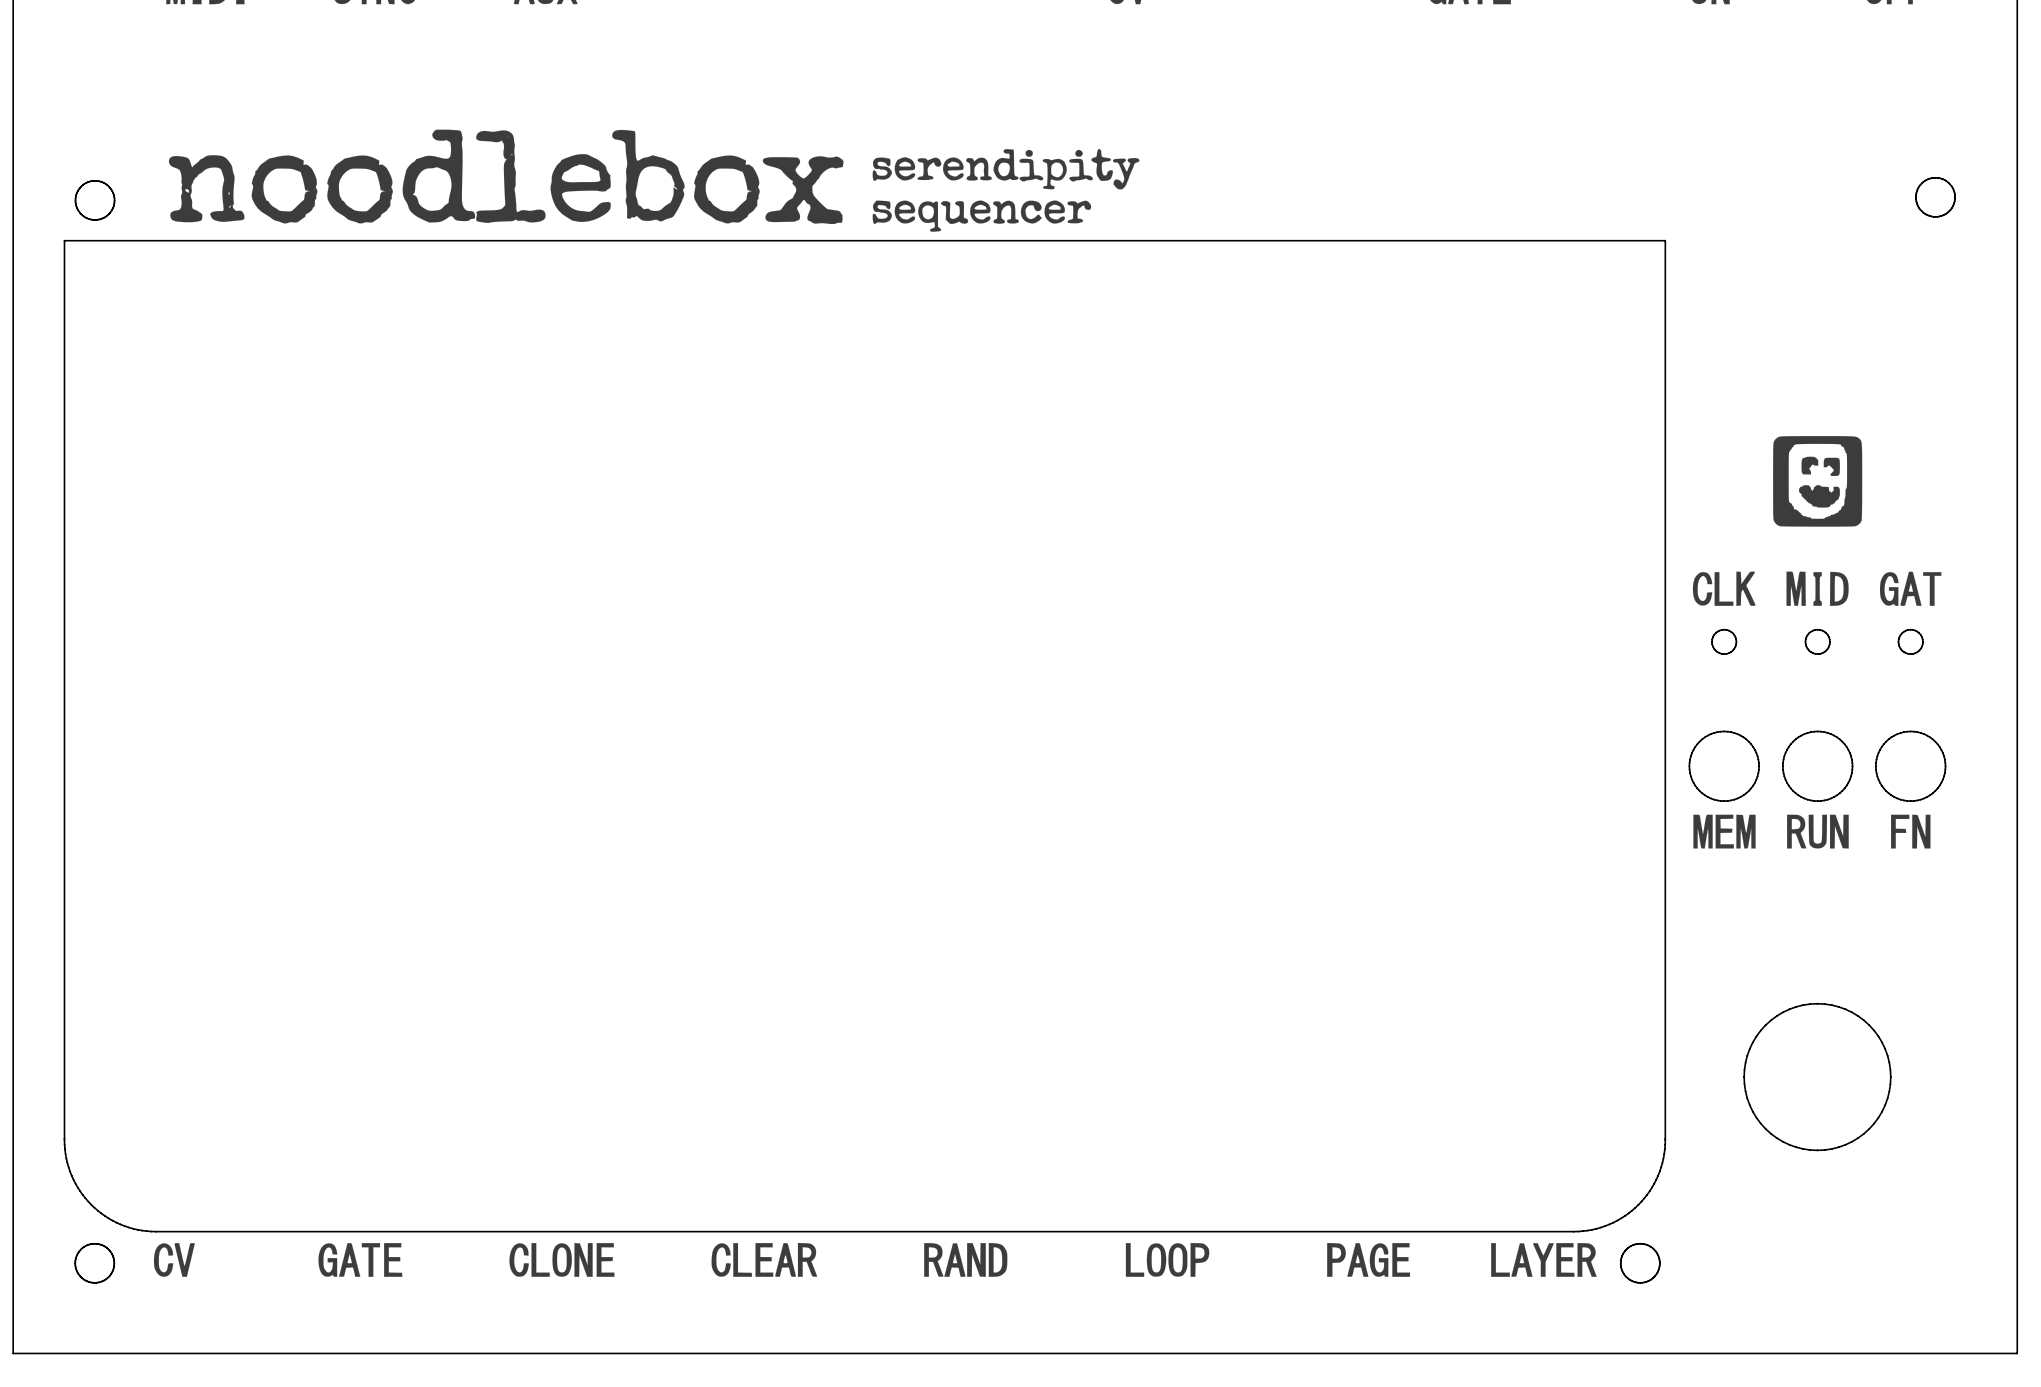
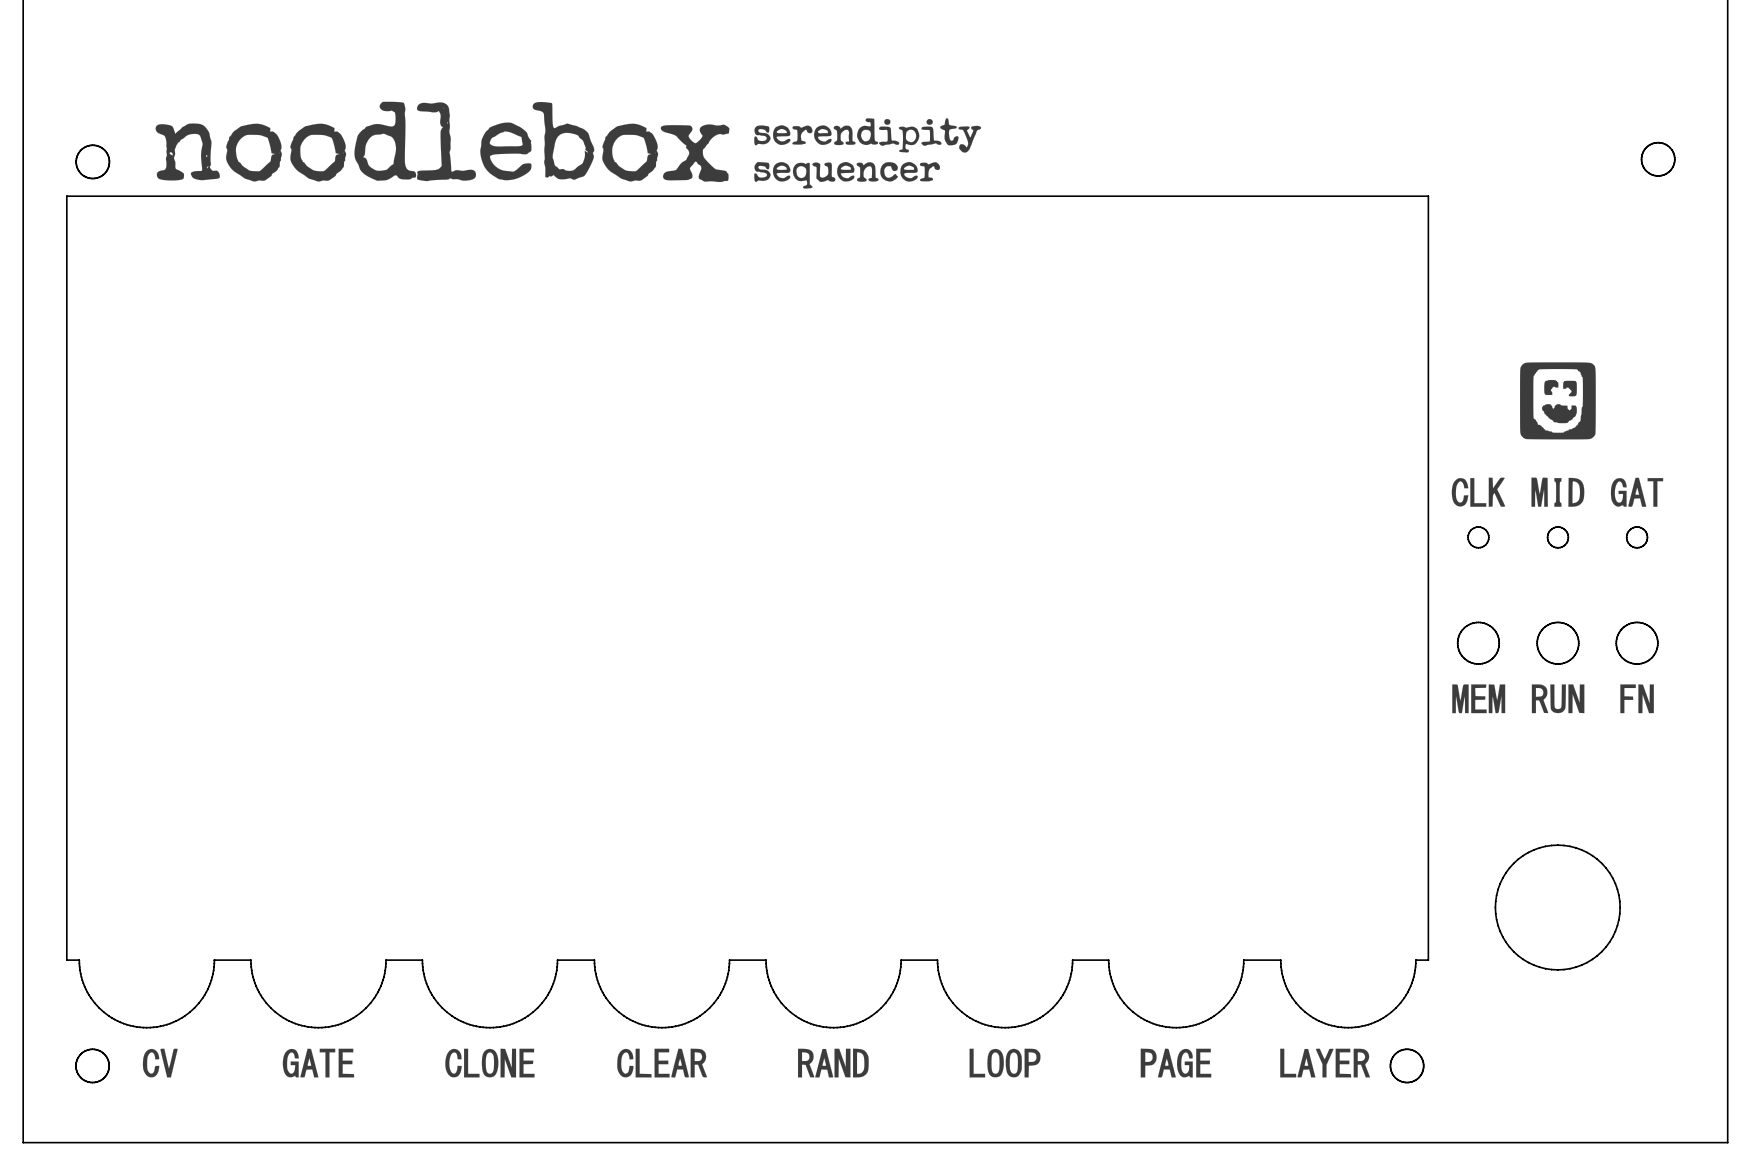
board edge: (1724, 731) (1710, 734) (1699, 741) (1692, 752) (1689, 766) (1692, 779) (1699, 790) (1710, 798) (1724, 801) (1737, 798) (1748, 790) (1756, 779) (1759, 766) (1756, 752) (1748, 741) (1737, 734) (1724, 731) -> none
board edge: (1817, 731) (1804, 734) (1793, 741) (1785, 752) (1782, 766) (1785, 779) (1793, 790) (1804, 798) (1817, 801) (1831, 798) (1842, 790) (1849, 779) (1852, 766) (1849, 752) (1842, 741) (1831, 734) (1817, 731) -> none
board edge: (1910, 731) (1897, 734) (1886, 741) (1878, 752) (1875, 766) (1878, 779) (1886, 790) (1897, 798) (1910, 801) (1924, 798) (1935, 790) (1942, 779) (1945, 766) (1942, 752) (1935, 741) (1924, 734) (1910, 731) -> none
board edge: none -> (1478, 622) (1470, 624) (1463, 628) (1459, 635) (1457, 643) (1459, 651) (1463, 657) (1470, 662) (1478, 664) (1486, 662) (1493, 657) (1497, 651) (1499, 643) (1497, 635) (1493, 628) (1486, 624) (1478, 622)
board edge: none -> (1557, 622) (1550, 624) (1543, 628) (1538, 635) (1537, 643) (1538, 651) (1543, 657) (1550, 662) (1557, 664) (1565, 662) (1572, 657) (1577, 651) (1578, 643) (1577, 635) (1572, 628) (1565, 624) (1557, 622)
board edge: none -> (1637, 622) (1629, 624) (1622, 628) (1617, 635) (1616, 643) (1617, 651) (1622, 657) (1629, 662) (1637, 664) (1645, 662) (1651, 657) (1656, 651) (1657, 643) (1656, 635) (1651, 628) (1645, 624) (1637, 622)
board edge: (64, 1138) (66, 1158) (71, 1175) (80, 1191) (91, 1204) (104, 1215) (120, 1224) (137, 1229) (156, 1231) (1578, 1231) (1596, 1228) (1613, 1222) (1628, 1213) (1641, 1201) (1652, 1187) (1659, 1171) (1665, 1138) -> (66, 960) (79, 960) (80, 973) (85, 989) (94, 1003) (103, 1012) (123, 1023) (146, 1027) (173, 1022) (194, 1007) (209, 986) (214, 960) (250, 960) (256, 986) (270, 1007) (292, 1022) (318, 1027) (344, 1022) (366, 1007) (380, 986) (386, 960) (422, 960) (427, 986) (442, 1007) (463, 1022) (489, 1027) (516, 1022) (537, 1007) (552, 986) (557, 960) (594, 960) (599, 986) (614, 1007) (635, 1022) (661, 1027) (688, 1022) (709, 1007) (724, 986) (729, 960) (766, 960) (771, 986) (785, 1007) (807, 1022) (833, 1027) (859, 1022) (881, 1007) (895, 986) (901, 960) (937, 960) (942, 986) (957, 1007) (978, 1022) (1005, 1027) (1031, 1022) (1052, 1007) (1067, 986) (1072, 960) (1108, 960) (1113, 986) (1128, 1007) (1149, 1022) (1176, 1027) (1202, 1022) (1224, 1007) (1238, 986) (1243, 960) (1280, 960) (1286, 986) (1300, 1007) (1322, 1022) (1348, 1027) (1371, 1023) (1391, 1012) (1400, 1003) (1409, 989) (1414, 973) (1415, 960) (1428, 960)

